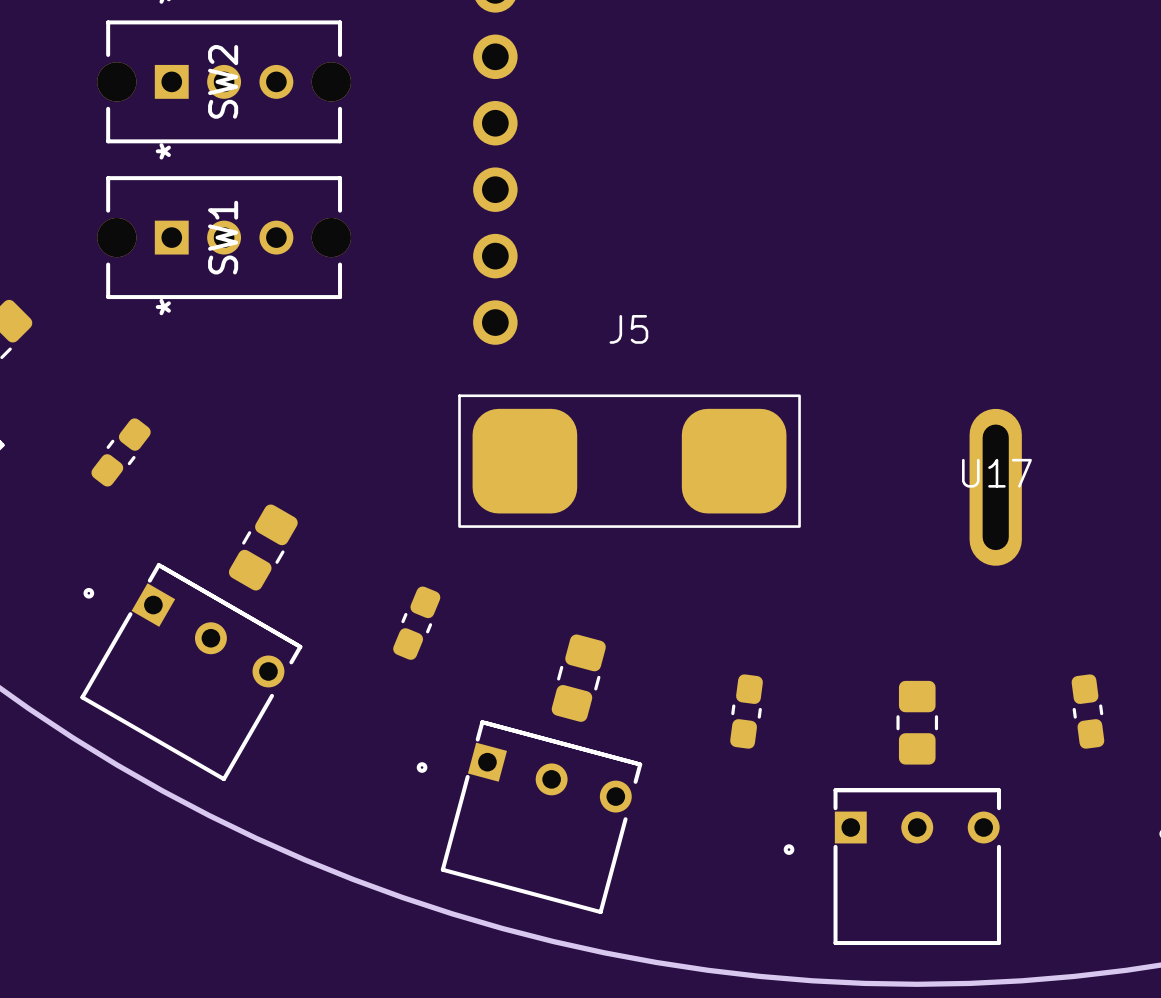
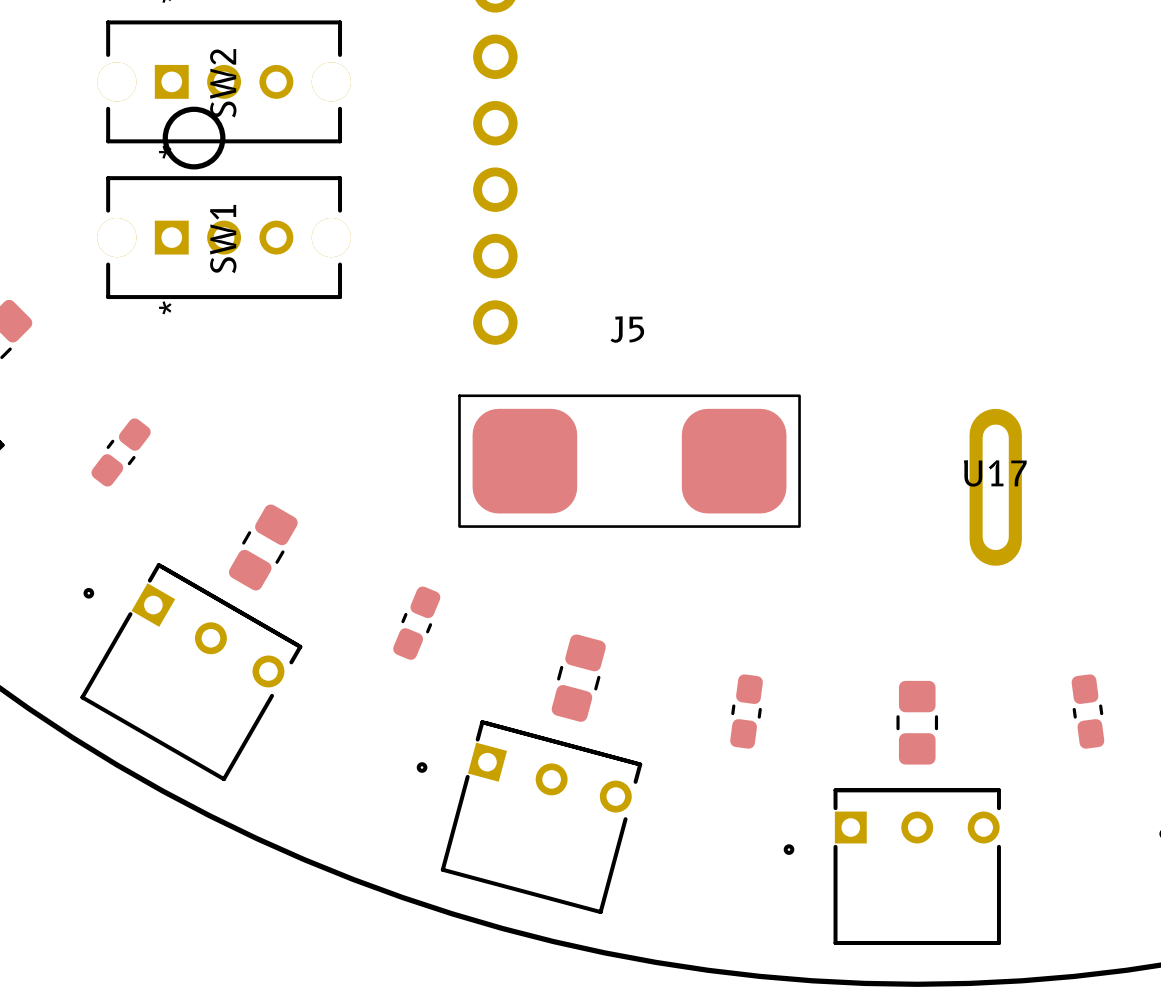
round board edge: none -> [162, 106, 226, 170]

